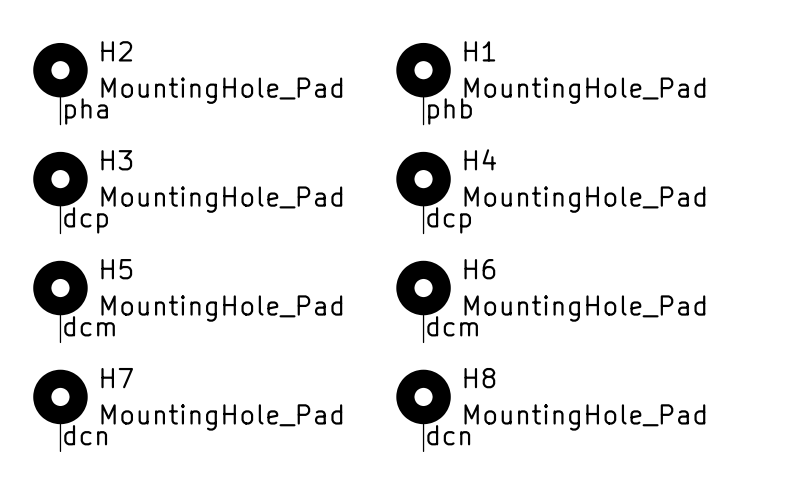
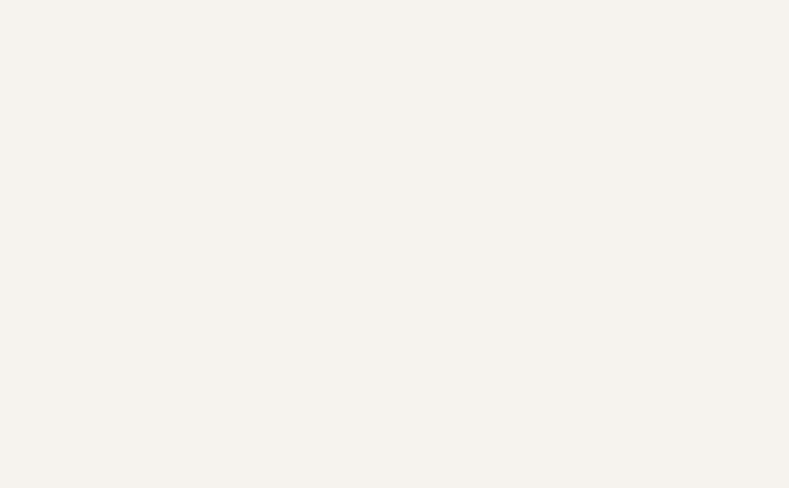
H2: MountingHole_Pad (60, 83) -> none
H1: MountingHole_Pad (423, 83) -> none
label: pha (86, 111) -> none
label: phb (450, 111) -> none
H3: MountingHole_Pad (60, 192) -> none
H4: MountingHole_Pad (423, 192) -> none
label: dcp (86, 220) -> none
label: dcp (449, 220) -> none
H5: MountingHole_Pad (60, 301) -> none
H6: MountingHole_Pad (423, 301) -> none
label: dcm (89, 326) -> none
label: dcm (452, 326) -> none
H7: MountingHole_Pad (60, 410) -> none
H8: MountingHole_Pad (423, 410) -> none
label: dcn (85, 435) -> none
label: dcn (448, 435) -> none

